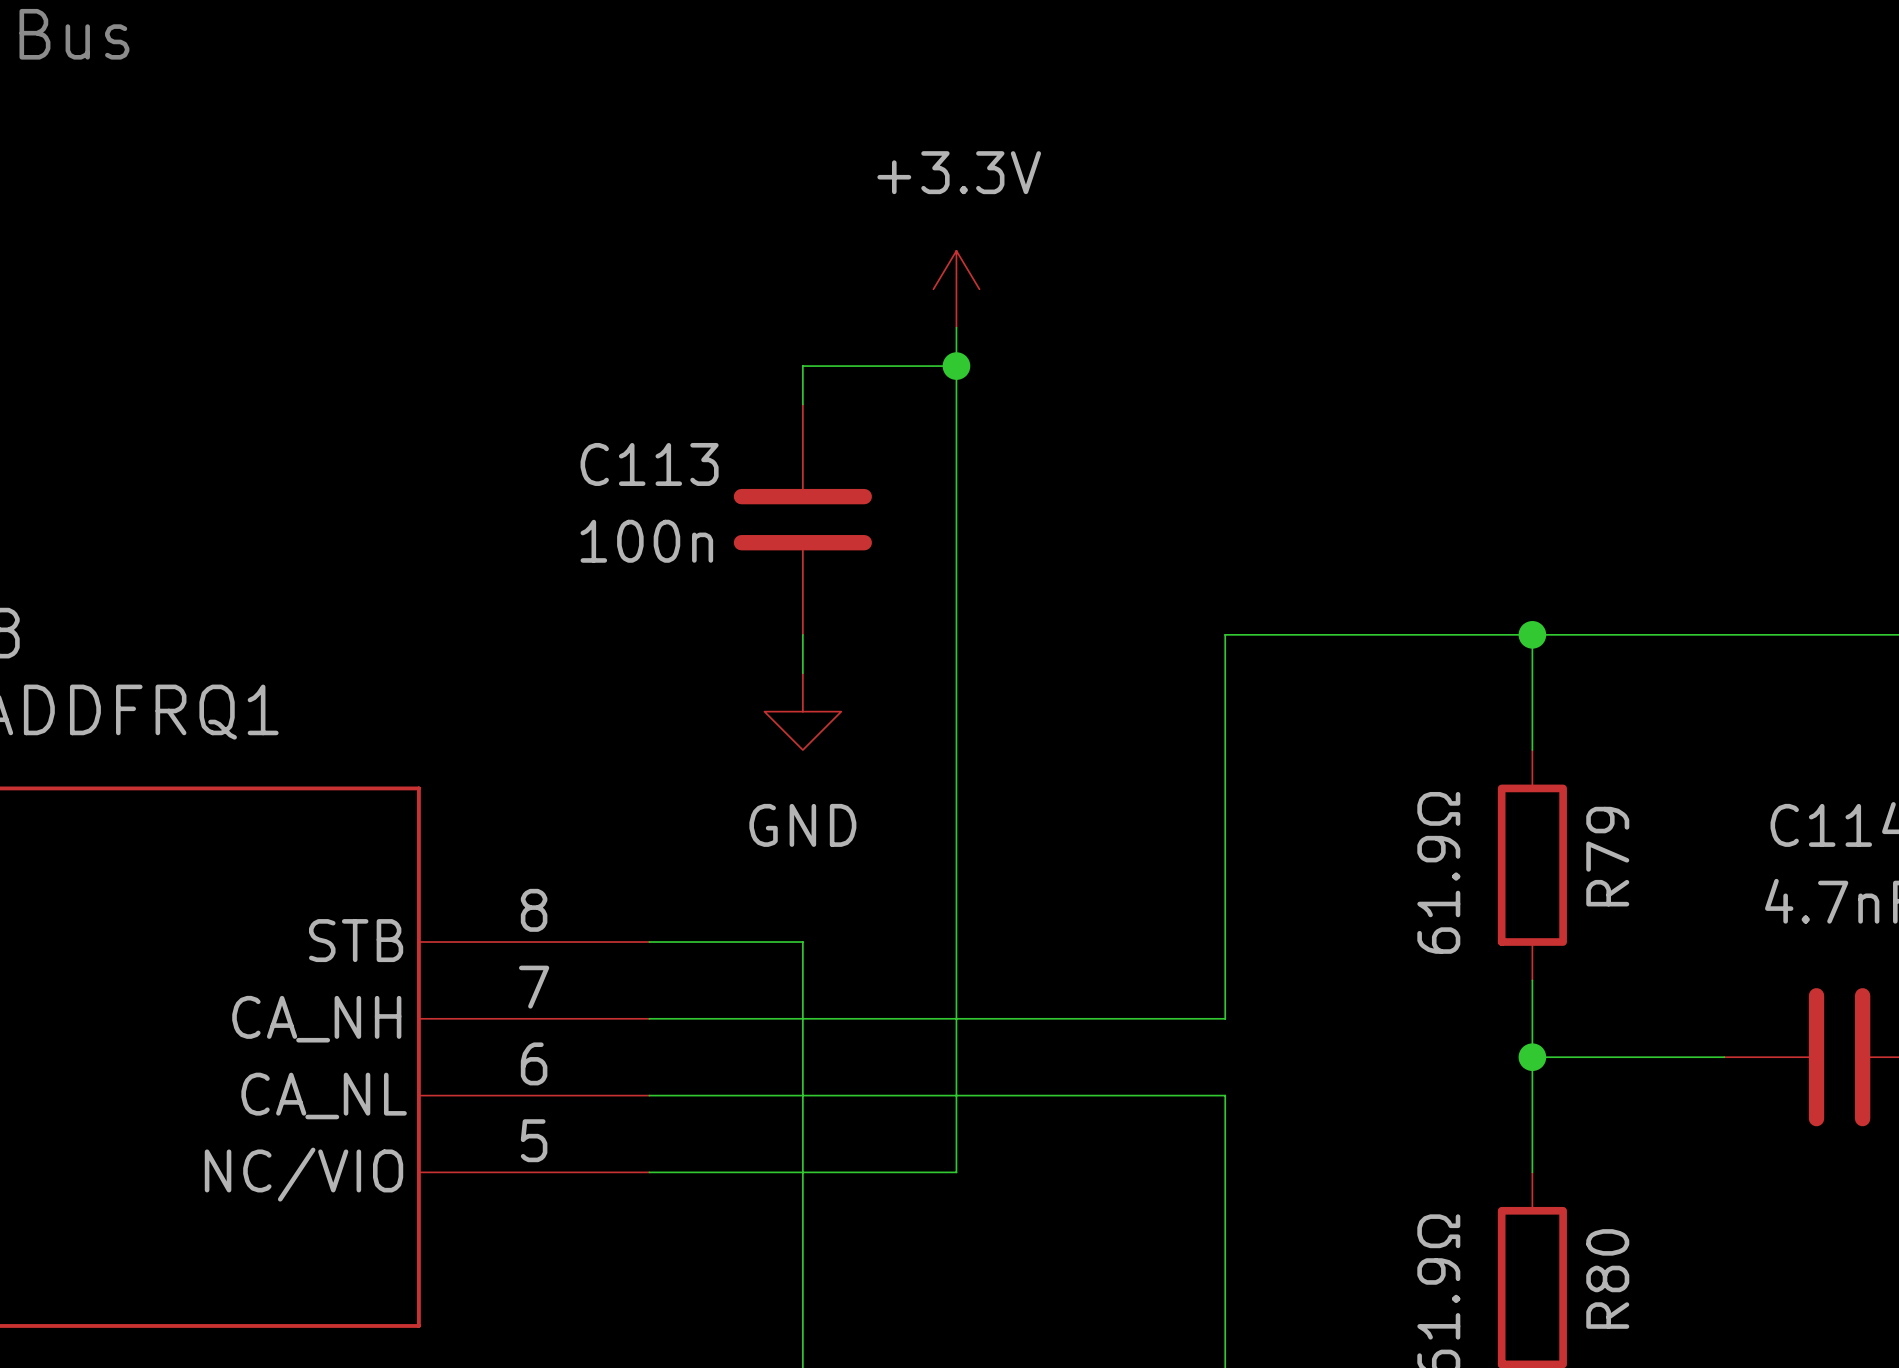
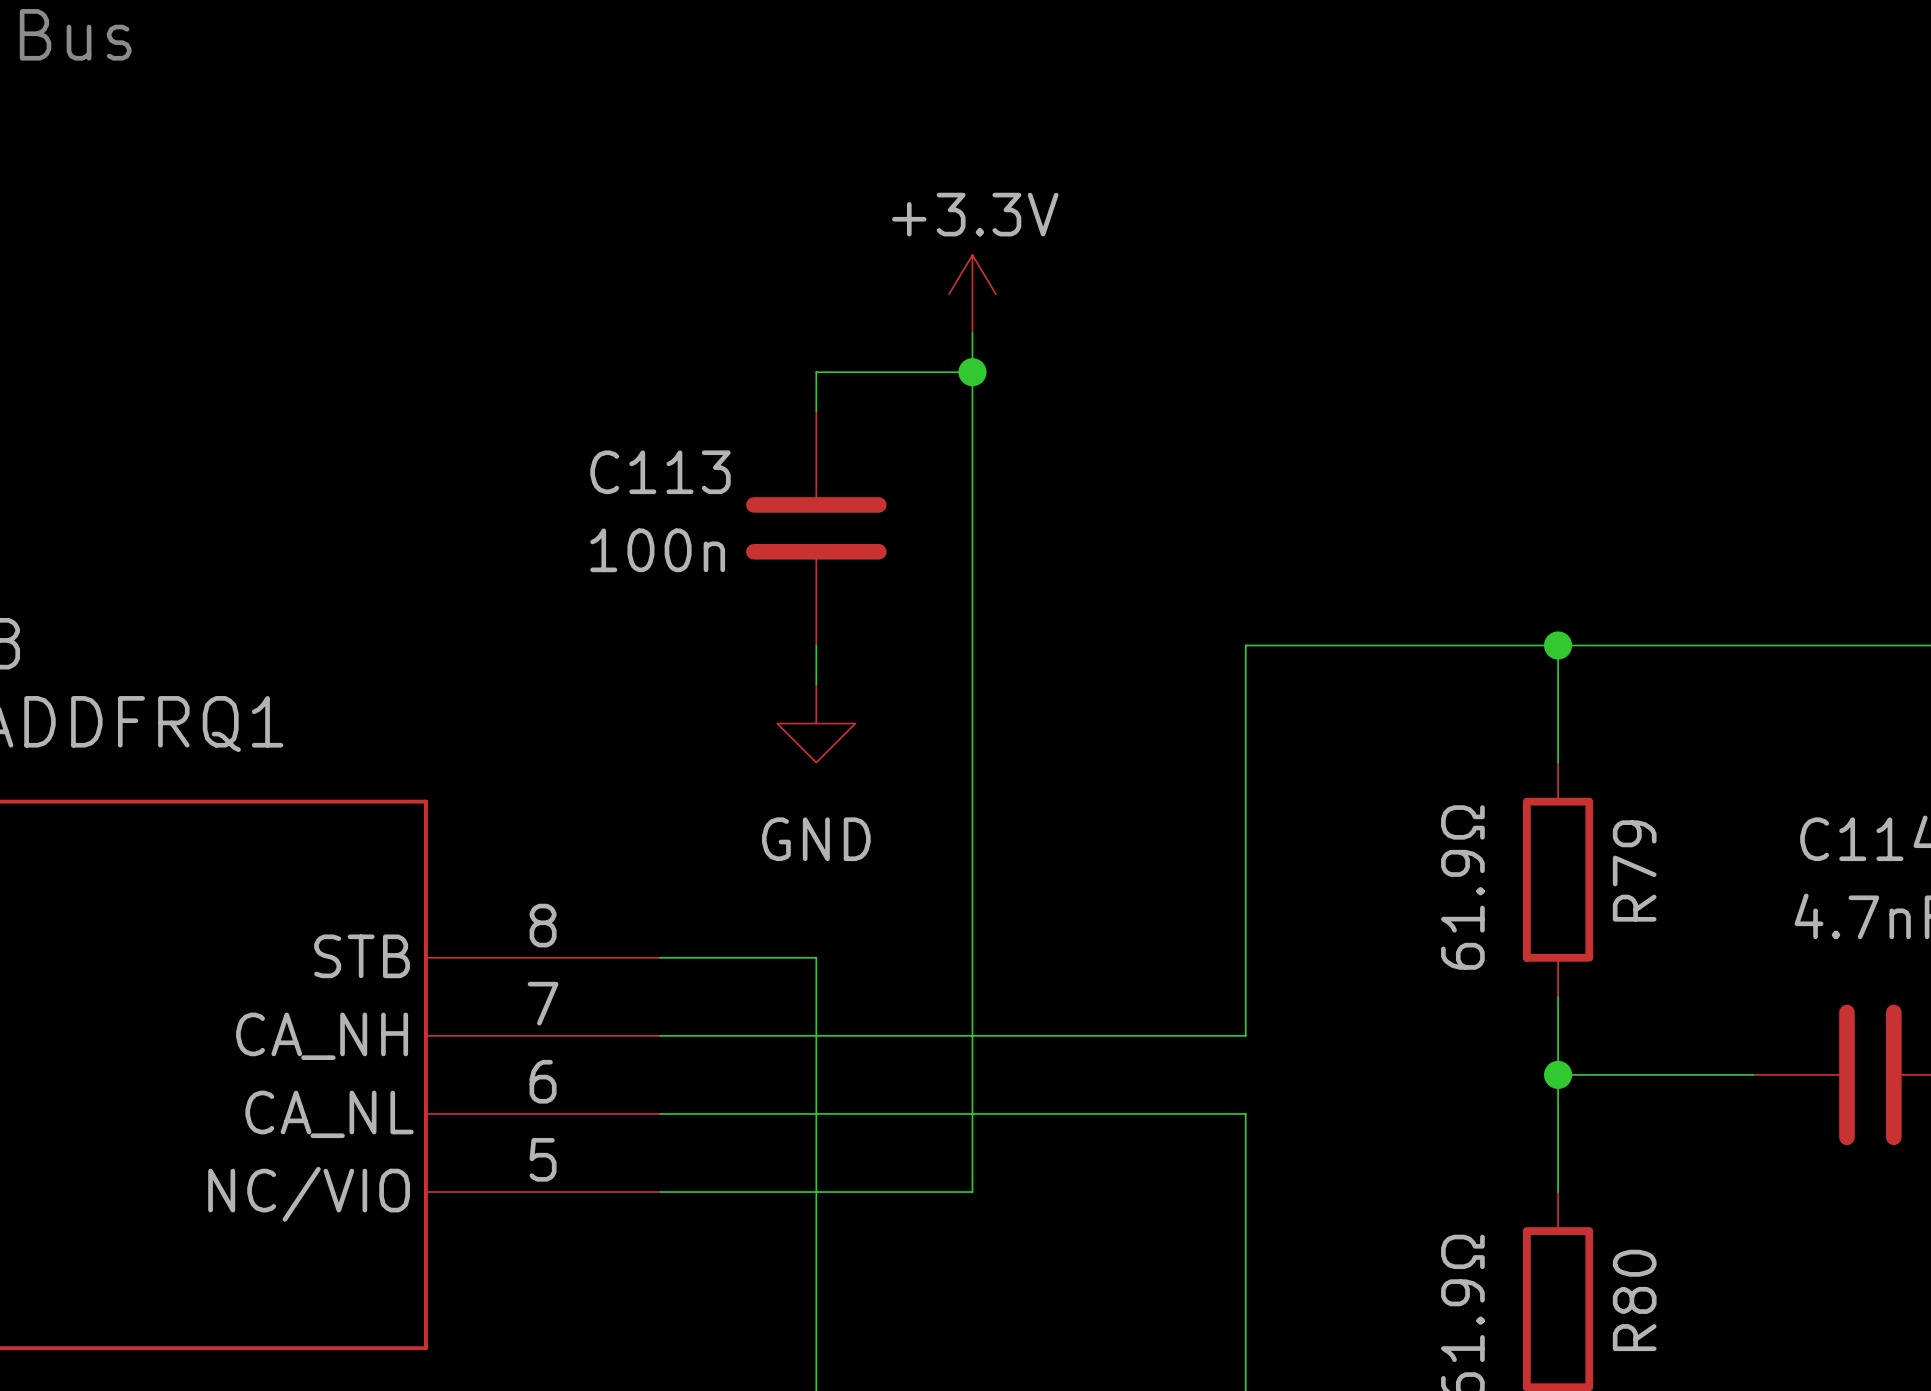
power symbol text position: +3.3V (959, 172) -> +3.3V (975, 214)

